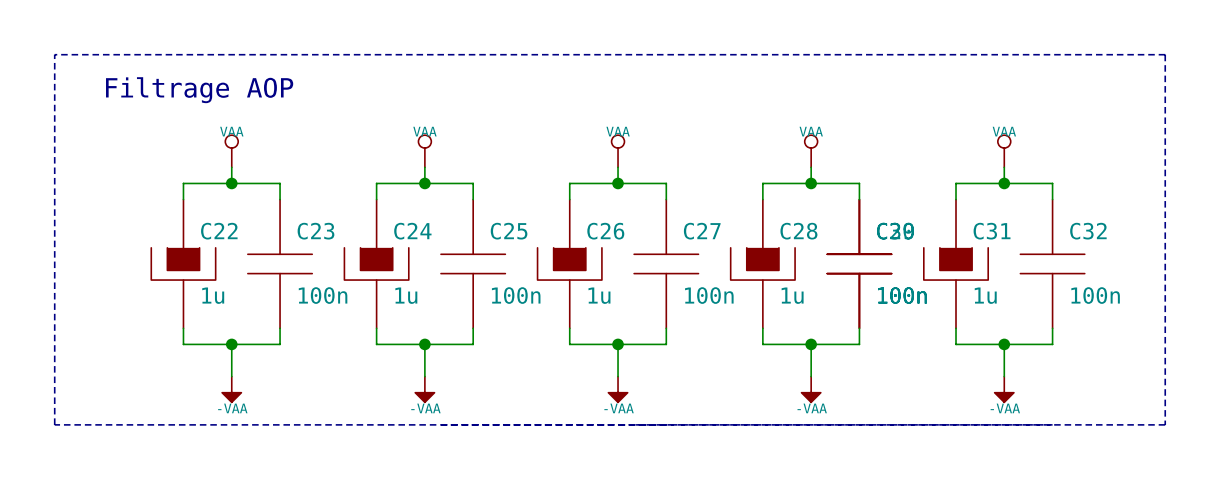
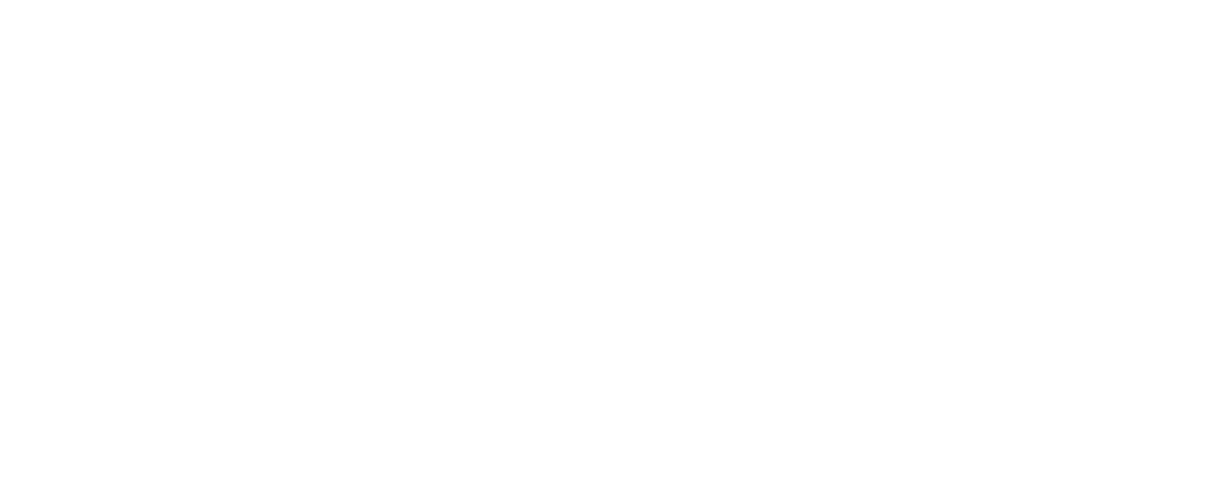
line: (54, 54) (1165, 54) (1165, 424) (54, 424) (54, 54) -> none
text: Filtrage AOP (199, 90) -> none
power symbol: VAA (231, 151) -> none
power symbol: VAA (424, 151) -> none
power symbol: VAA (618, 151) -> none
power symbol: VAA (811, 151) -> none
power symbol: VAA (1004, 151) -> none
wire: (231, 167) (231, 183) -> none
wire: (424, 167) (424, 183) -> none
wire: (618, 167) (618, 183) -> none
wire: (811, 167) (811, 183) -> none
wire: (1004, 167) (1004, 183) -> none
junction: (231, 183) -> none
junction: (424, 183) -> none
junction: (618, 183) -> none
junction: (811, 183) -> none
junction: (1004, 183) -> none
wire: (183, 199) (183, 183) (280, 183) (280, 199) -> none
wire: (376, 199) (376, 183) (473, 183) (473, 199) -> none
wire: (569, 199) (569, 183) (666, 183) (666, 199) -> none
wire: (762, 199) (762, 183) (859, 183) (859, 199) -> none
wire: (956, 199) (956, 183) (1052, 183) (1052, 199) -> none
C22: 1u (183, 263) -> none
C23: 100n (280, 263) -> none
C24: 1u (376, 263) -> none
C25: 100n (473, 263) -> none
C26: 1u (569, 263) -> none
C27: 100n (666, 263) -> none
C28: 1u (762, 263) -> none
part: 100n (859, 263) -> none
part: 100n (859, 263) -> none
C31: 1u (956, 263) -> none
C32: 100n (1052, 263) -> none
wire: (183, 328) (183, 344) (280, 344) (280, 328) -> none
wire: (376, 328) (376, 344) (473, 344) (473, 328) -> none
wire: (569, 328) (569, 344) (666, 344) (666, 328) -> none
wire: (762, 328) (762, 344) (859, 344) (859, 328) -> none
wire: (956, 328) (956, 344) (1052, 344) (1052, 328) -> none
wire: (231, 344) (231, 376) -> none
junction: (231, 344) -> none
wire: (424, 344) (424, 376) -> none
junction: (424, 344) -> none
wire: (618, 344) (618, 376) -> none
junction: (618, 344) -> none
wire: (811, 344) (811, 376) -> none
junction: (811, 344) -> none
wire: (1004, 344) (1004, 376) -> none
junction: (1004, 344) -> none
power symbol: -VAA (231, 389) -> none
power symbol: -VAA (424, 389) -> none
power symbol: -VAA (618, 389) -> none
power symbol: -VAA (811, 389) -> none
power symbol: -VAA (1004, 389) -> none

